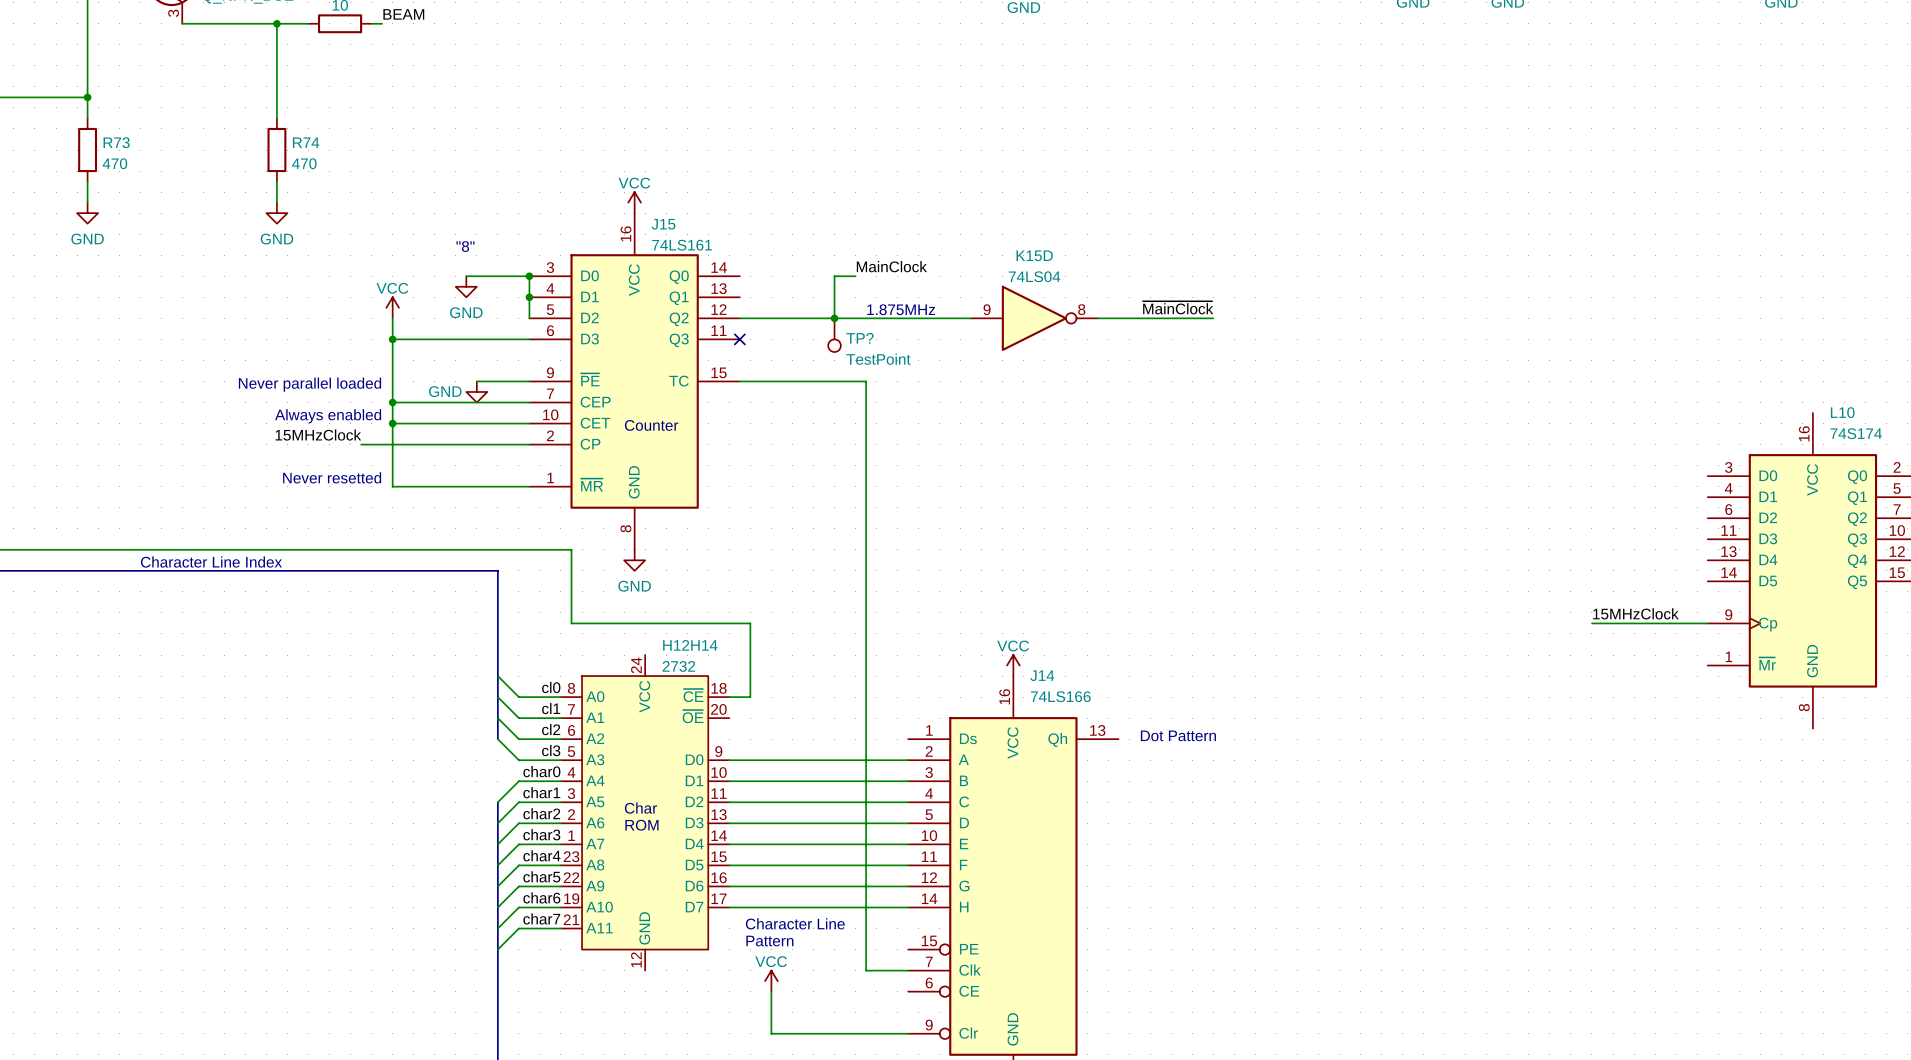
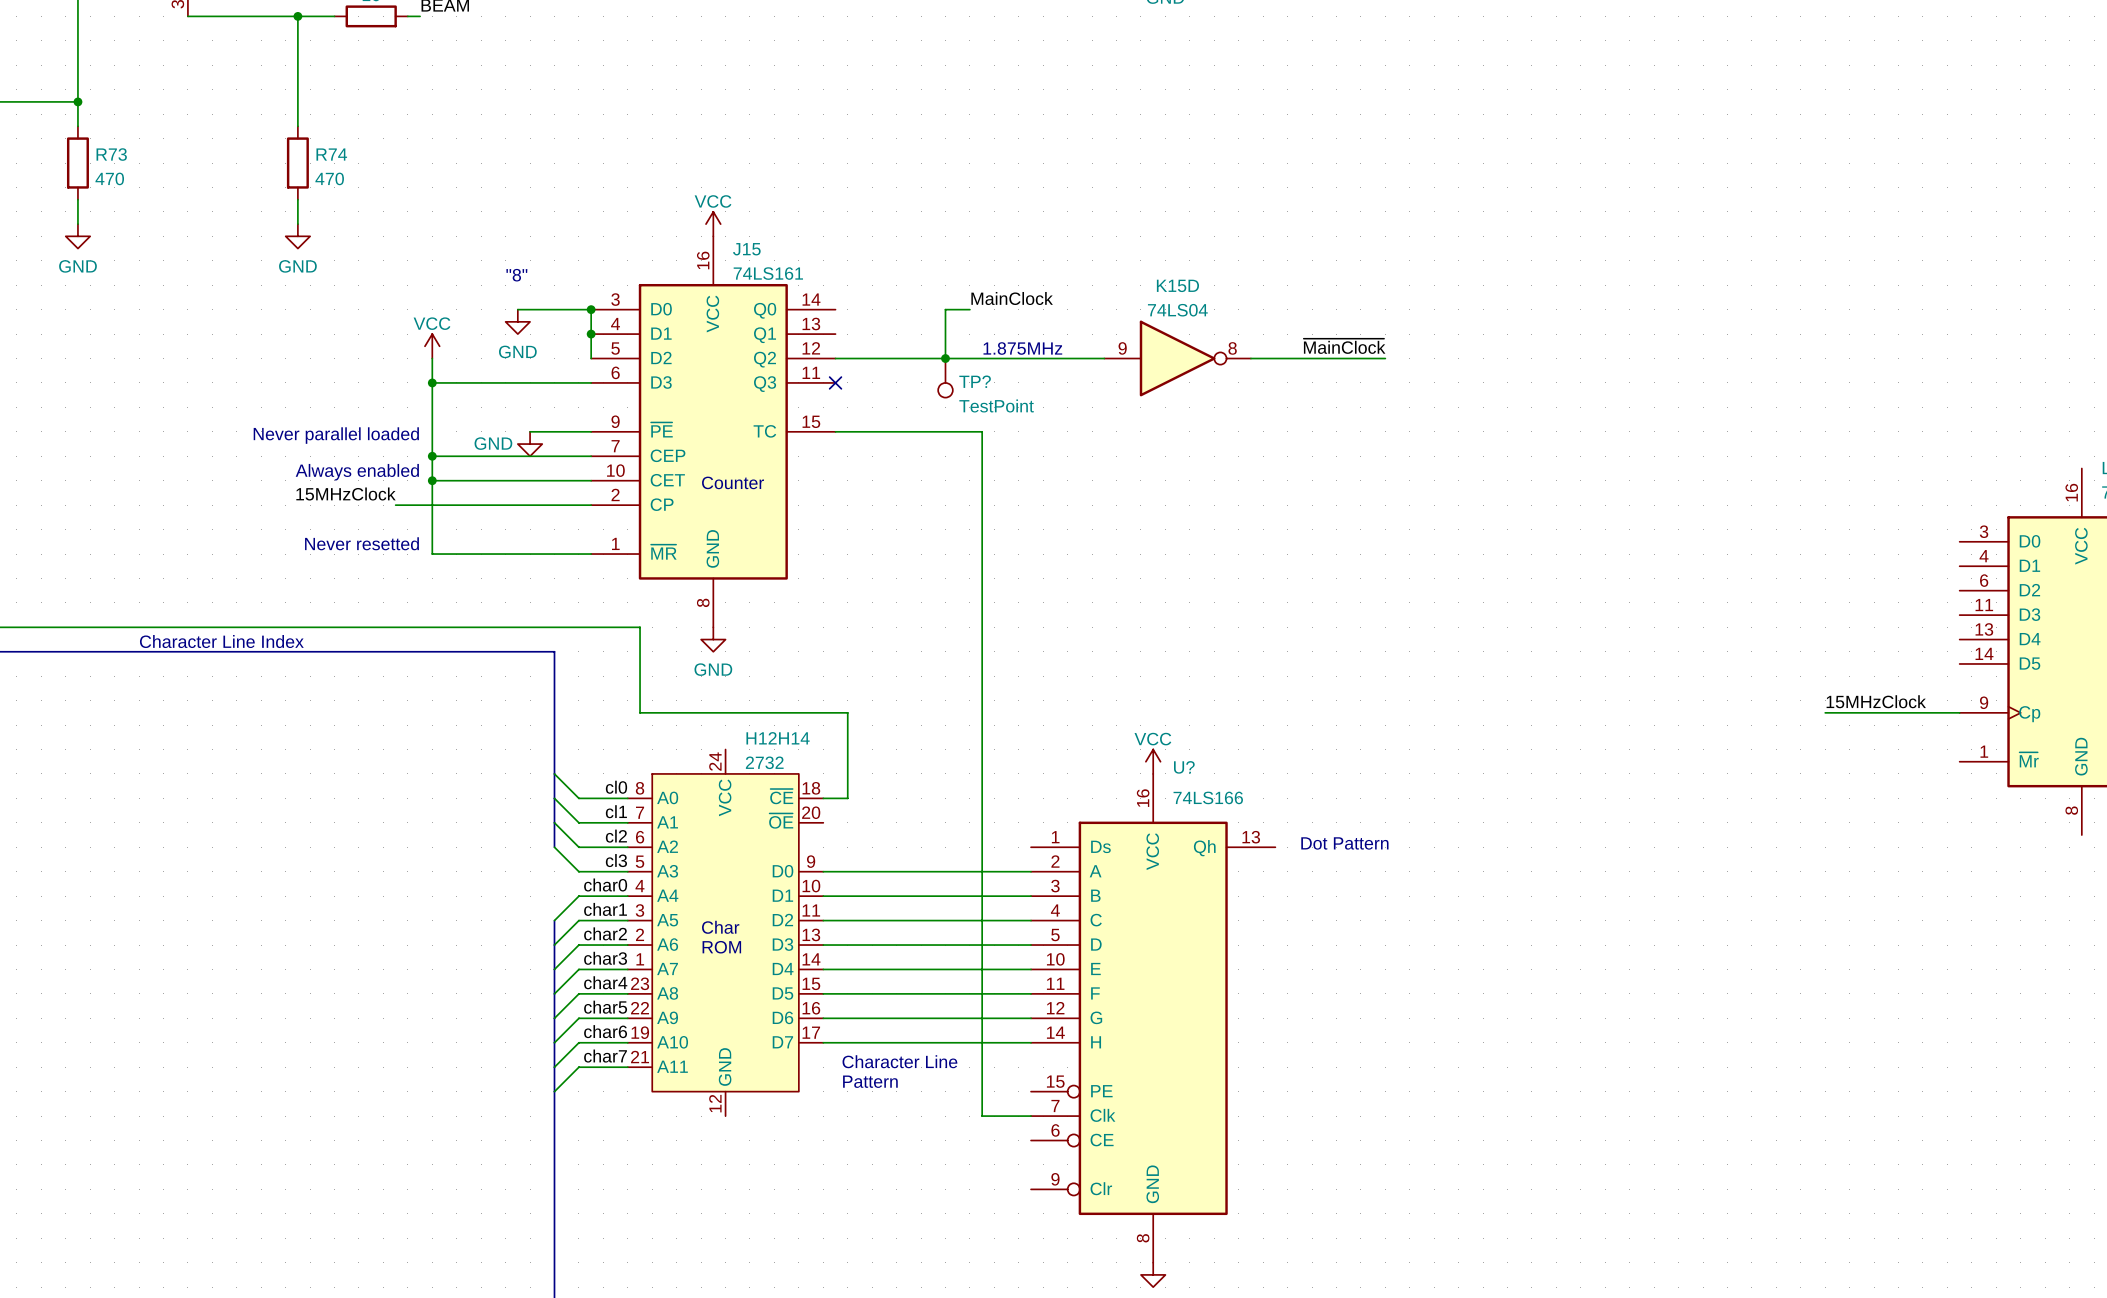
J14 name: J14 (1042, 675) -> U? (1184, 767)
power symbol: VCC (771, 981) -> none
wire: (771, 991) (771, 1033) (908, 1033) -> none

